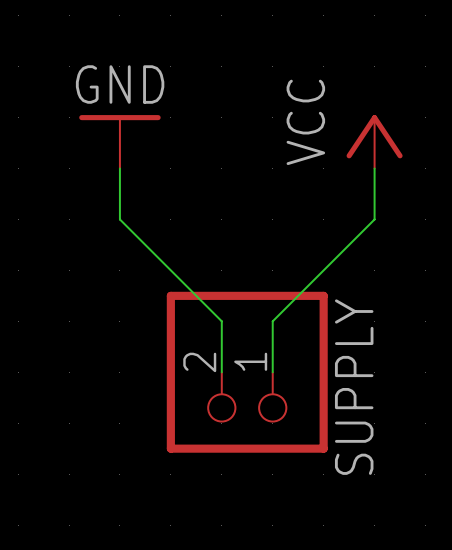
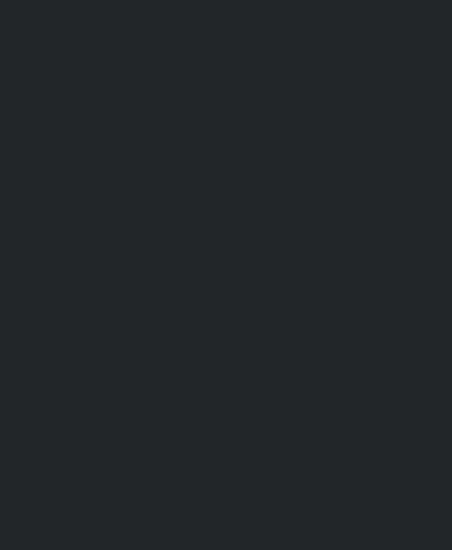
power symbol: GND (119, 141) -> none
power symbol: VCC (374, 141) -> none
wire: (119, 168) (119, 219) (221, 321) (221, 372) -> none
wire: (374, 168) (374, 219) (272, 321) (272, 372) -> none
SUPPLY: (247, 372) -> none

